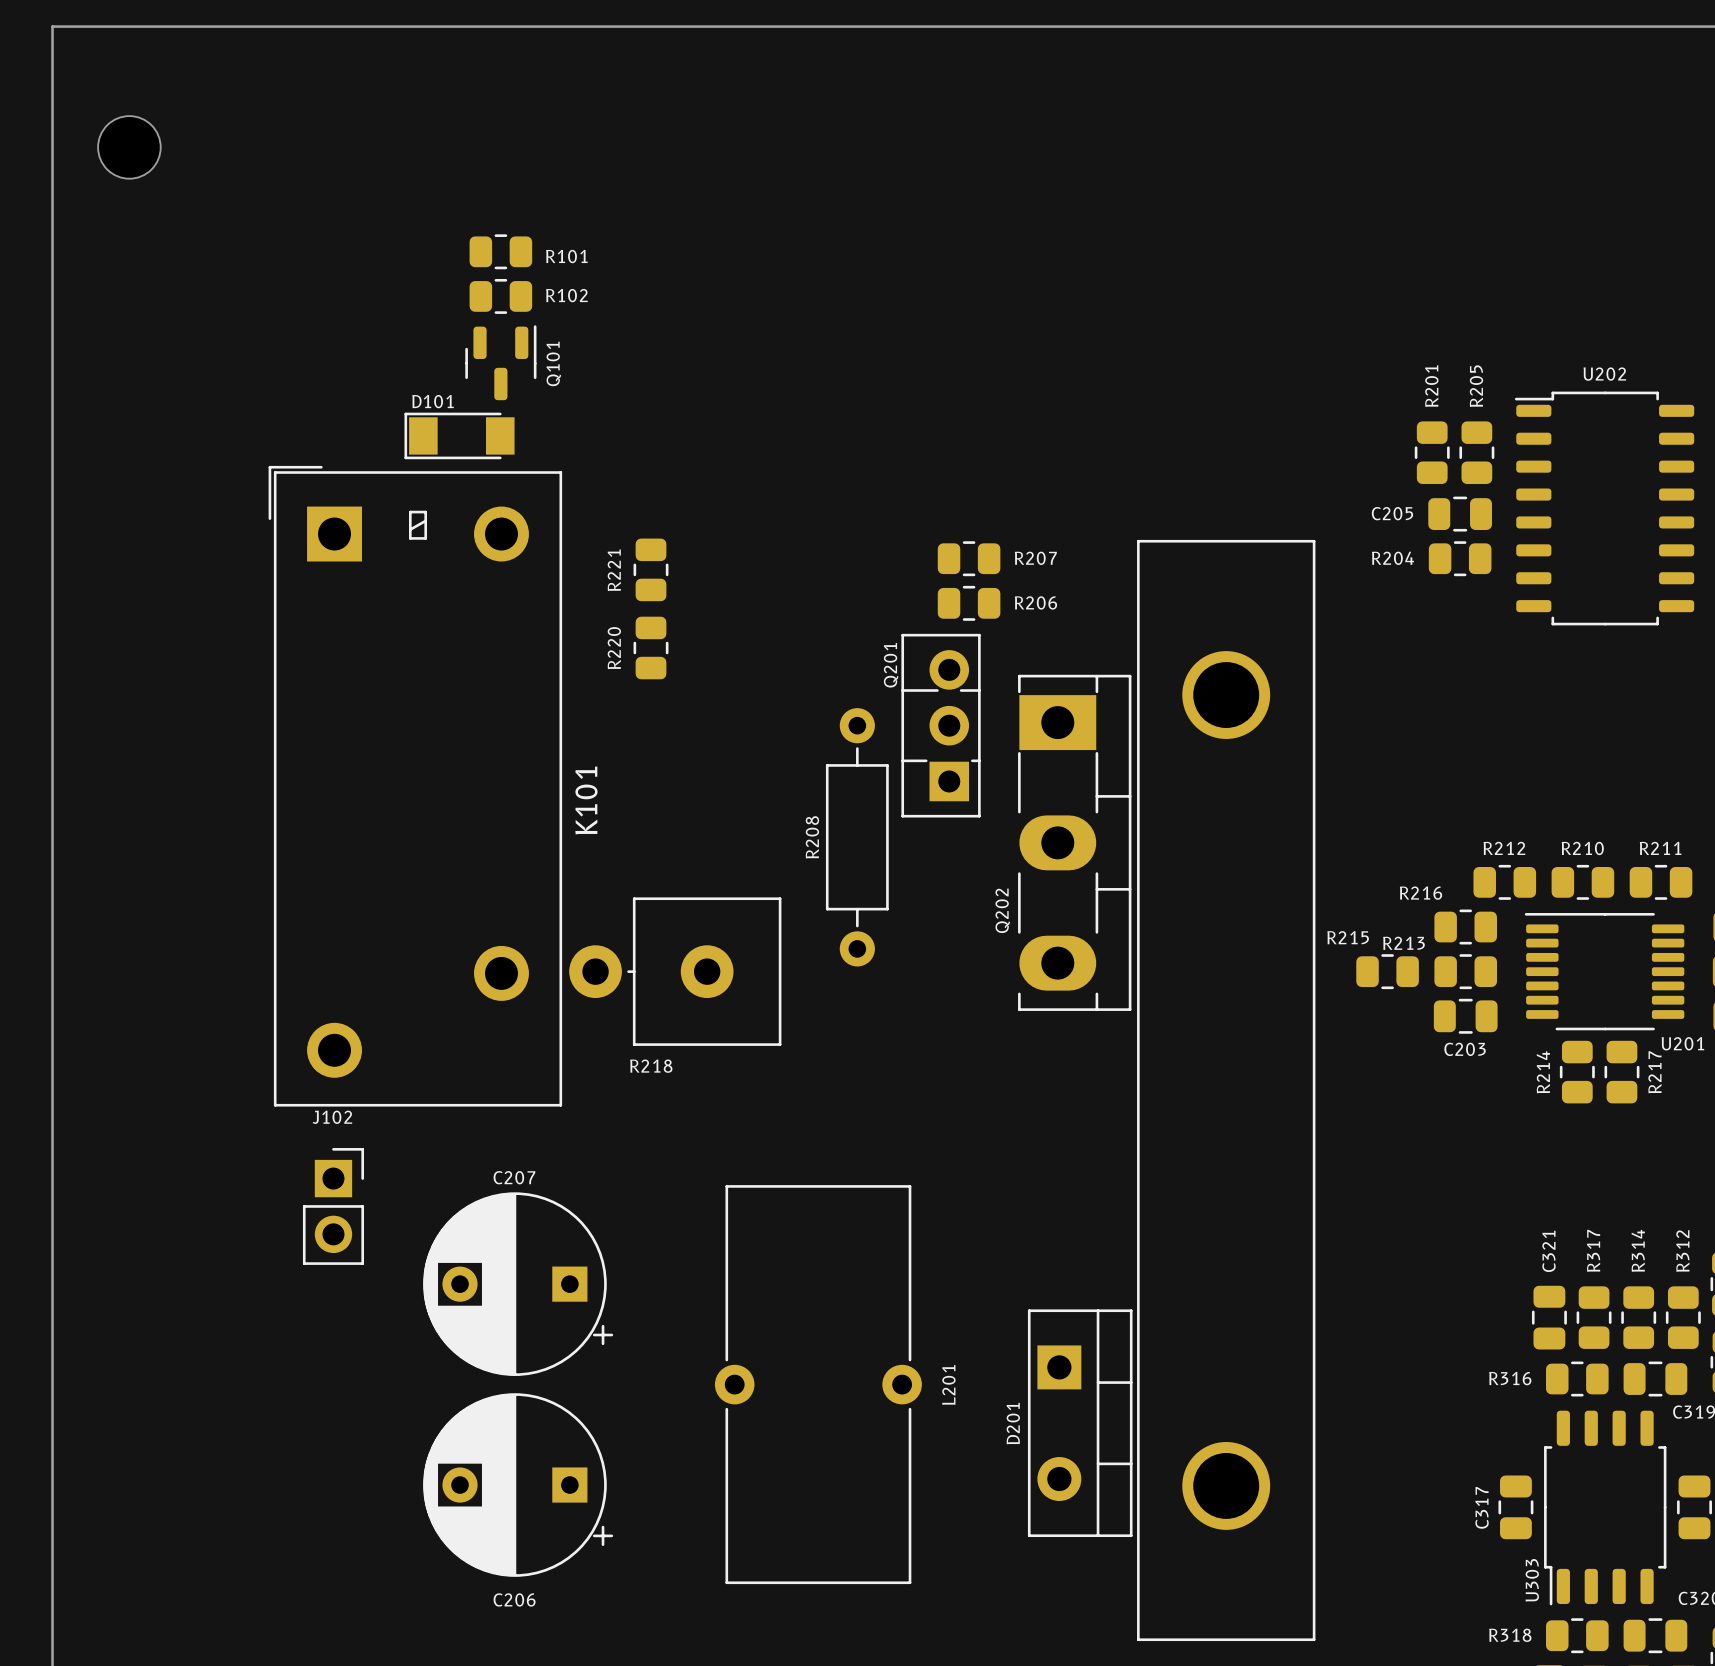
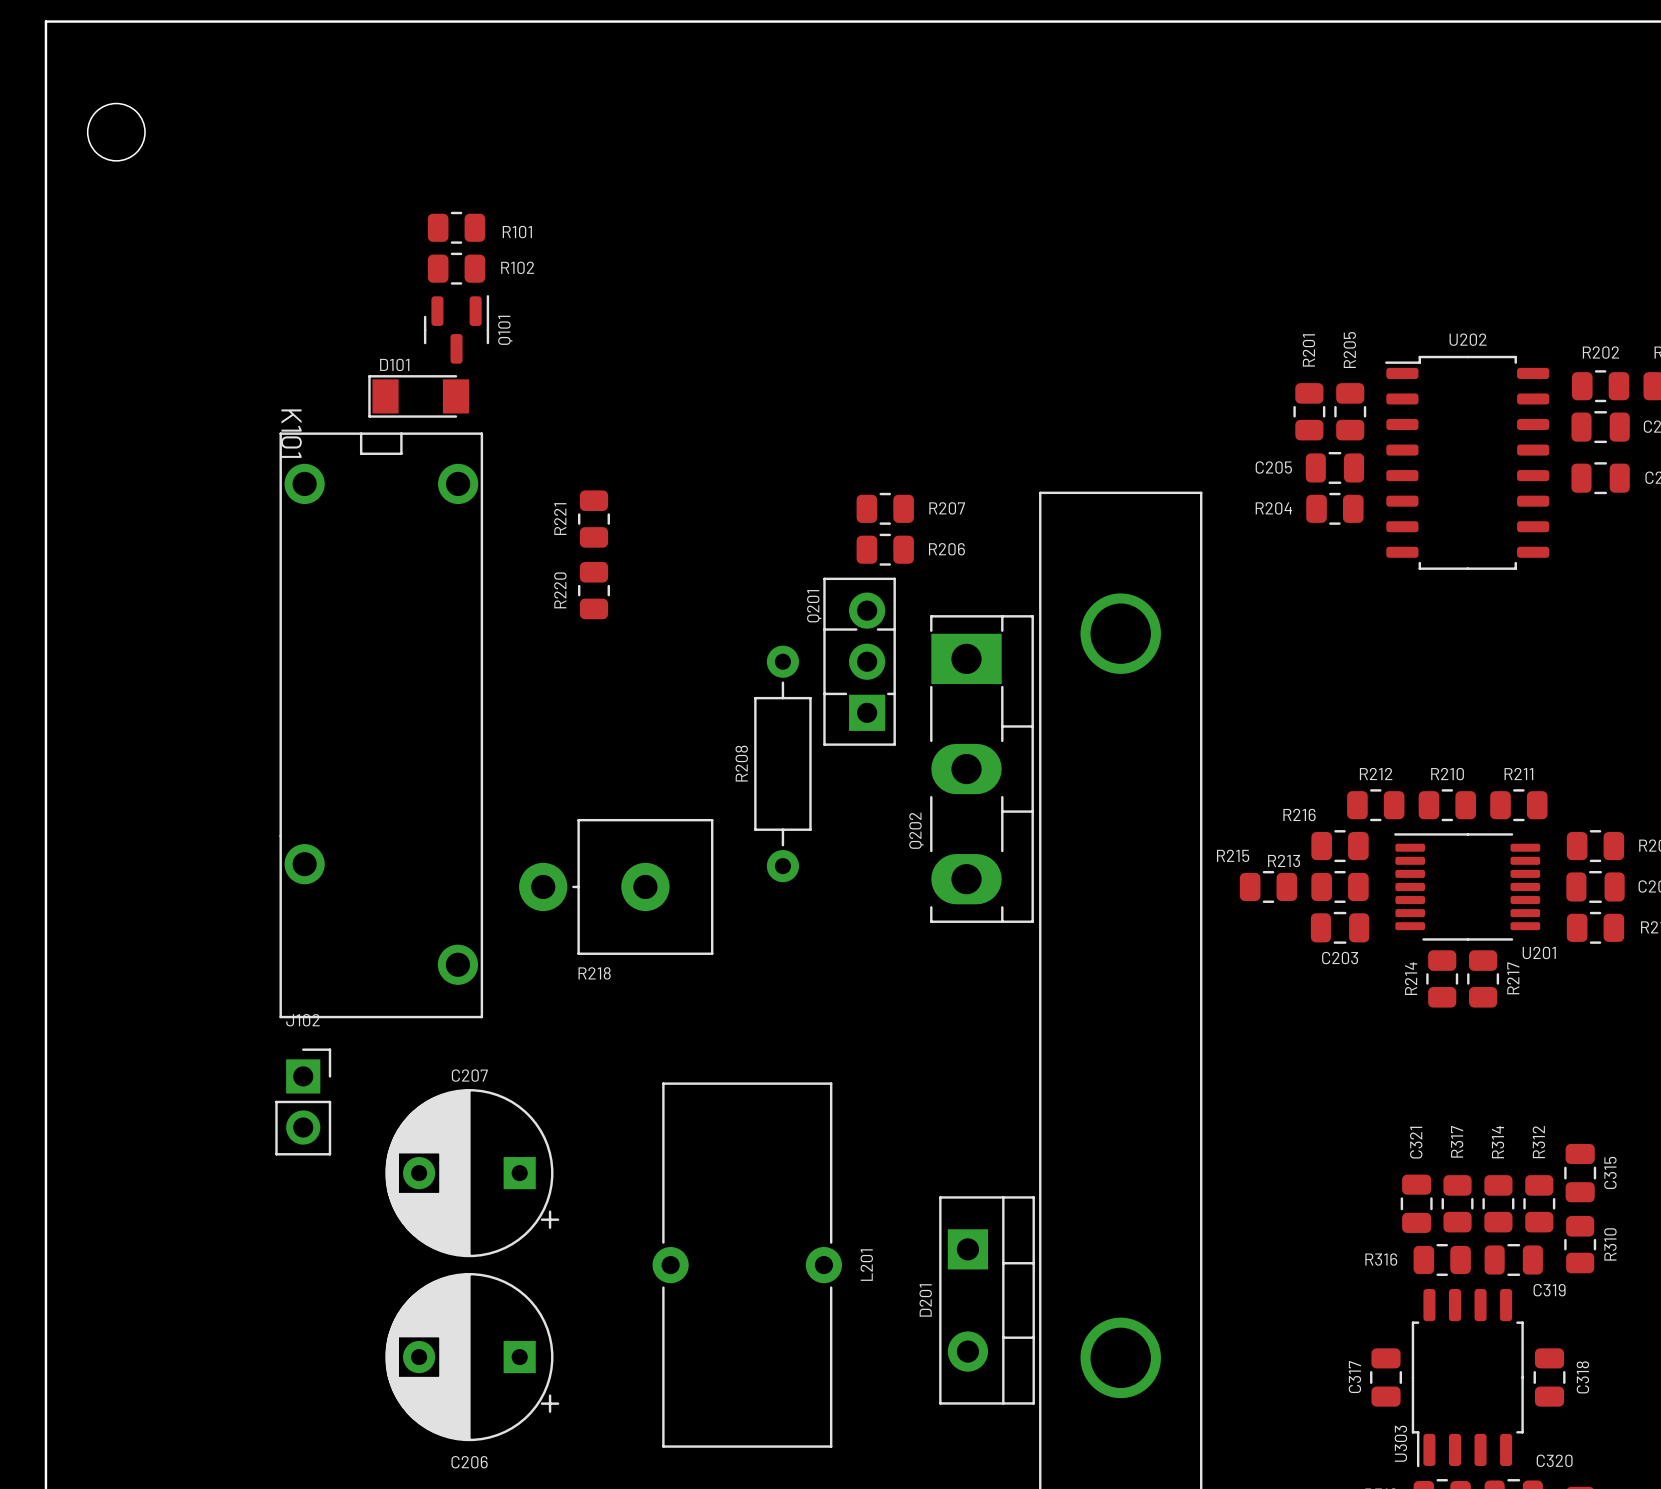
K101 footprint: [268, 465, 563, 1107] -> [279, 432, 484, 1019]
K101 name position: K101 (586, 800) -> K101 (291, 433)

